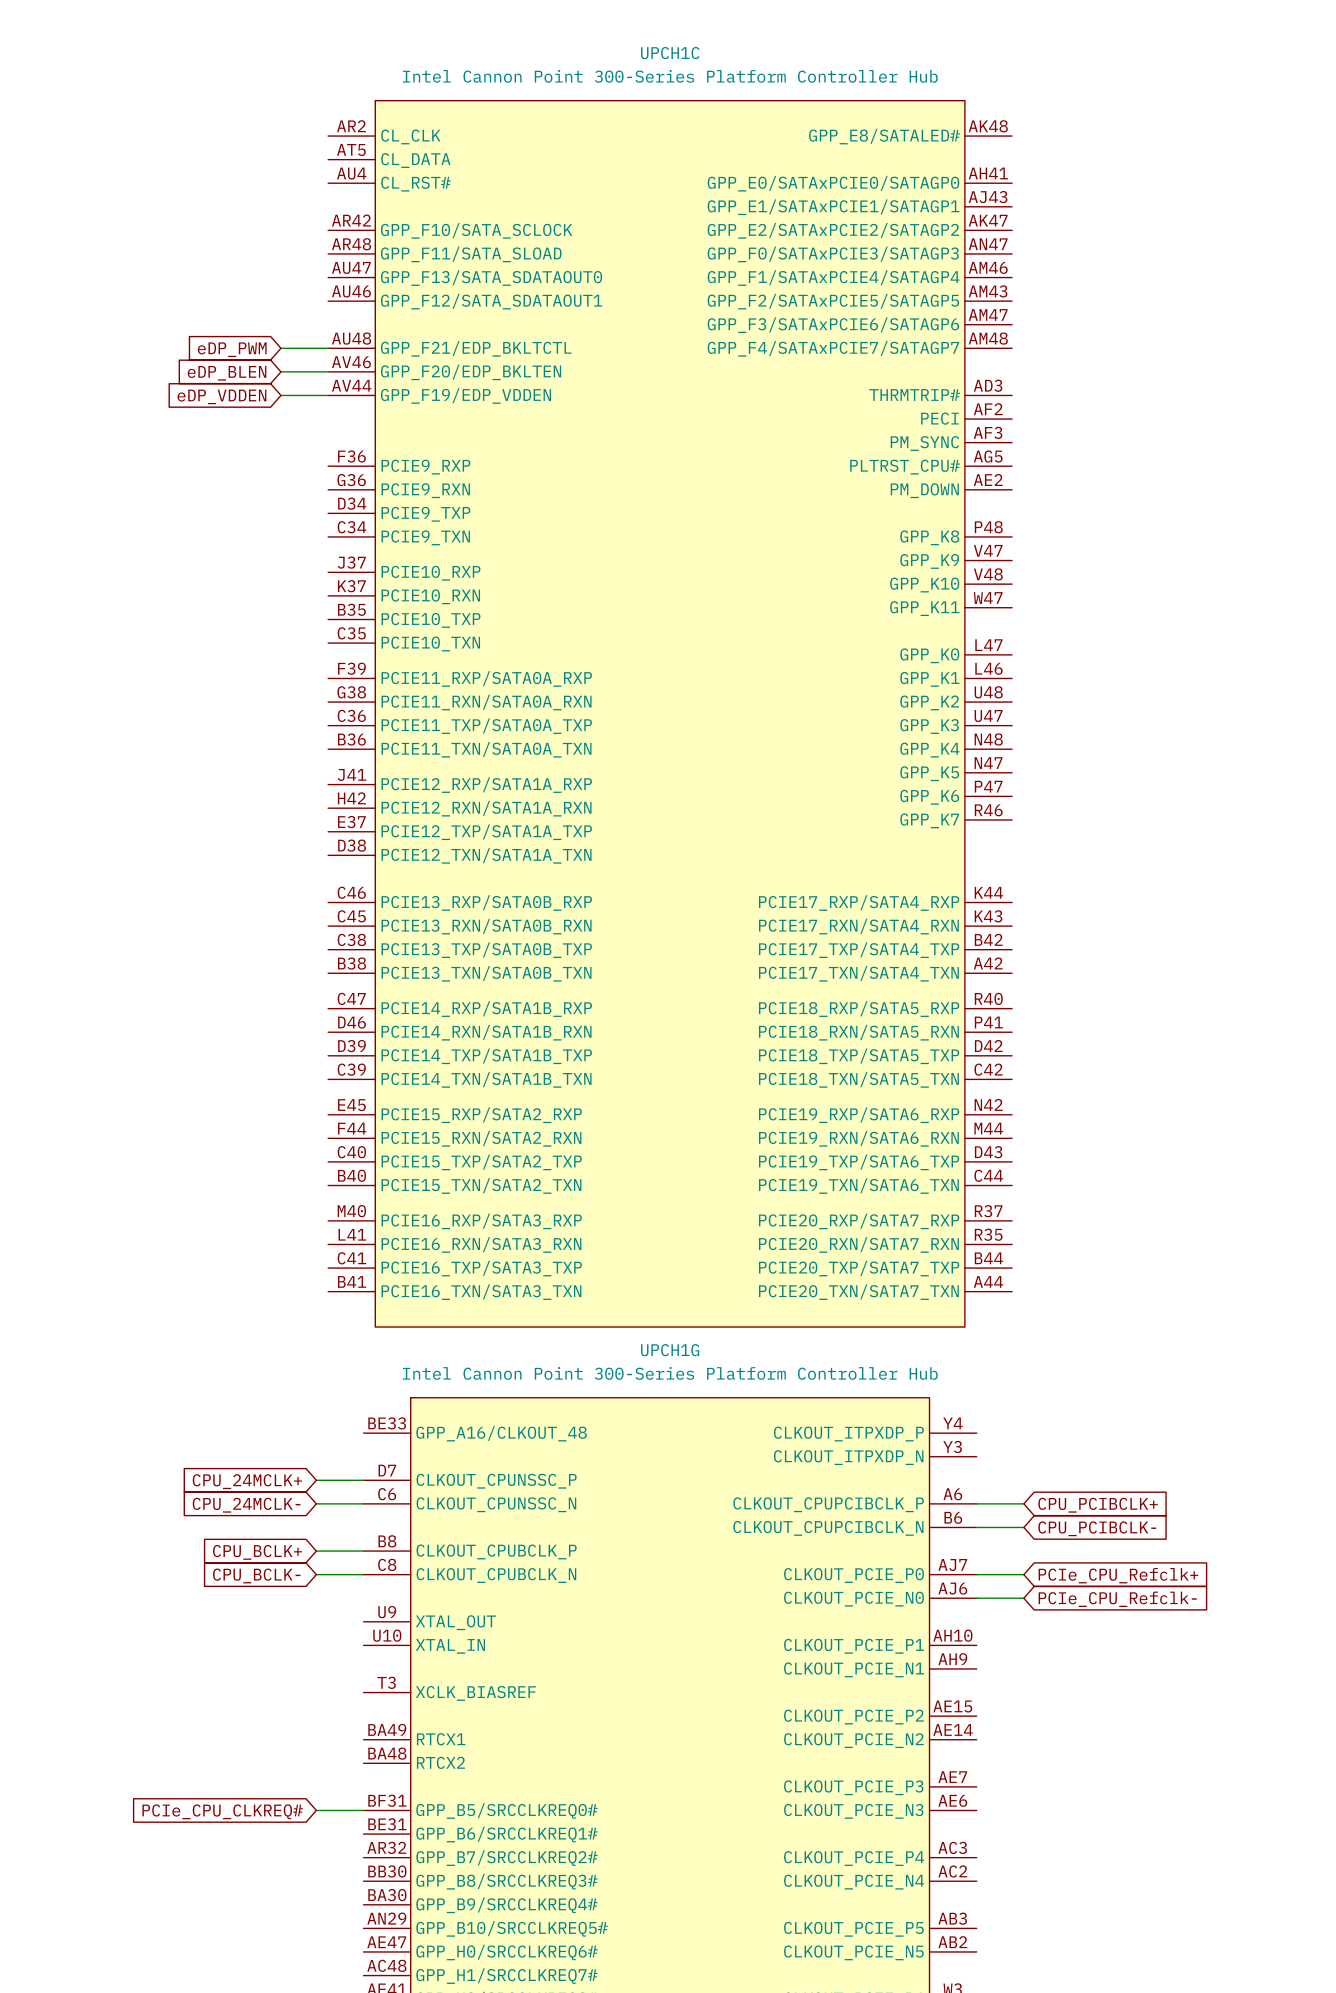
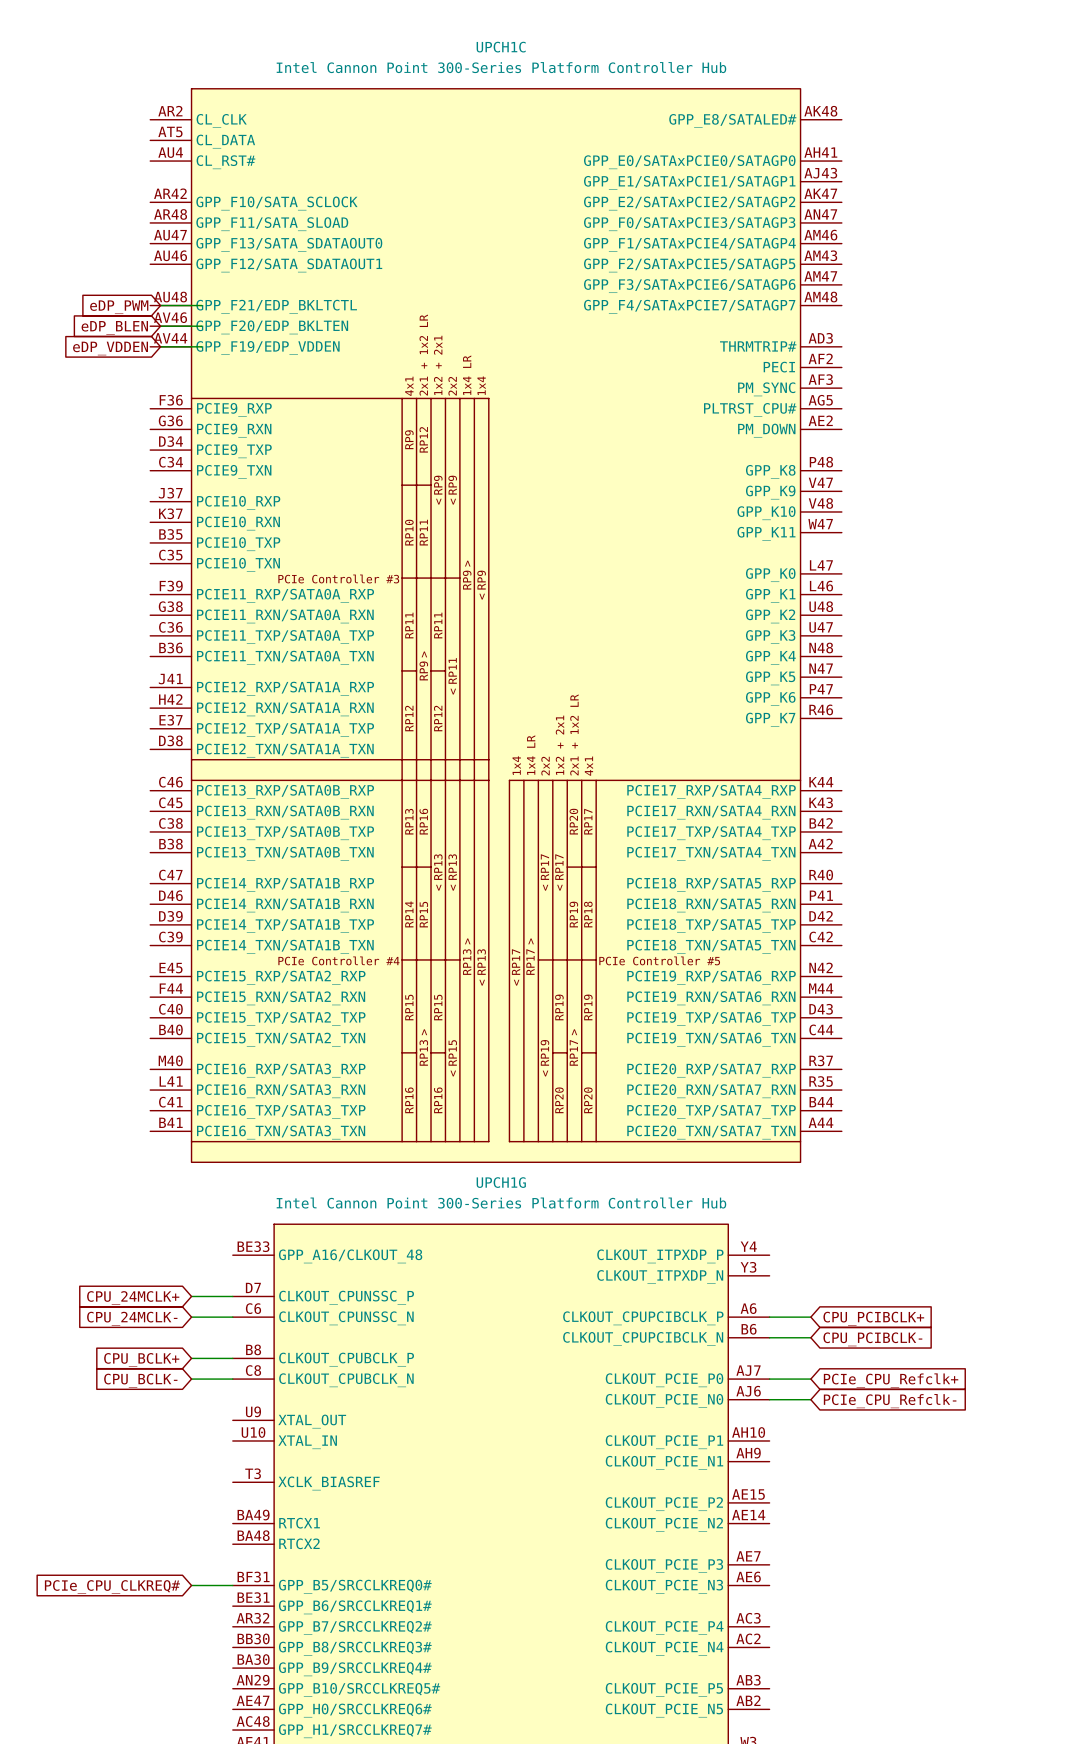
UPCH1C symbol: [328, 100, 1013, 1328] -> [150, 88, 842, 1163]

